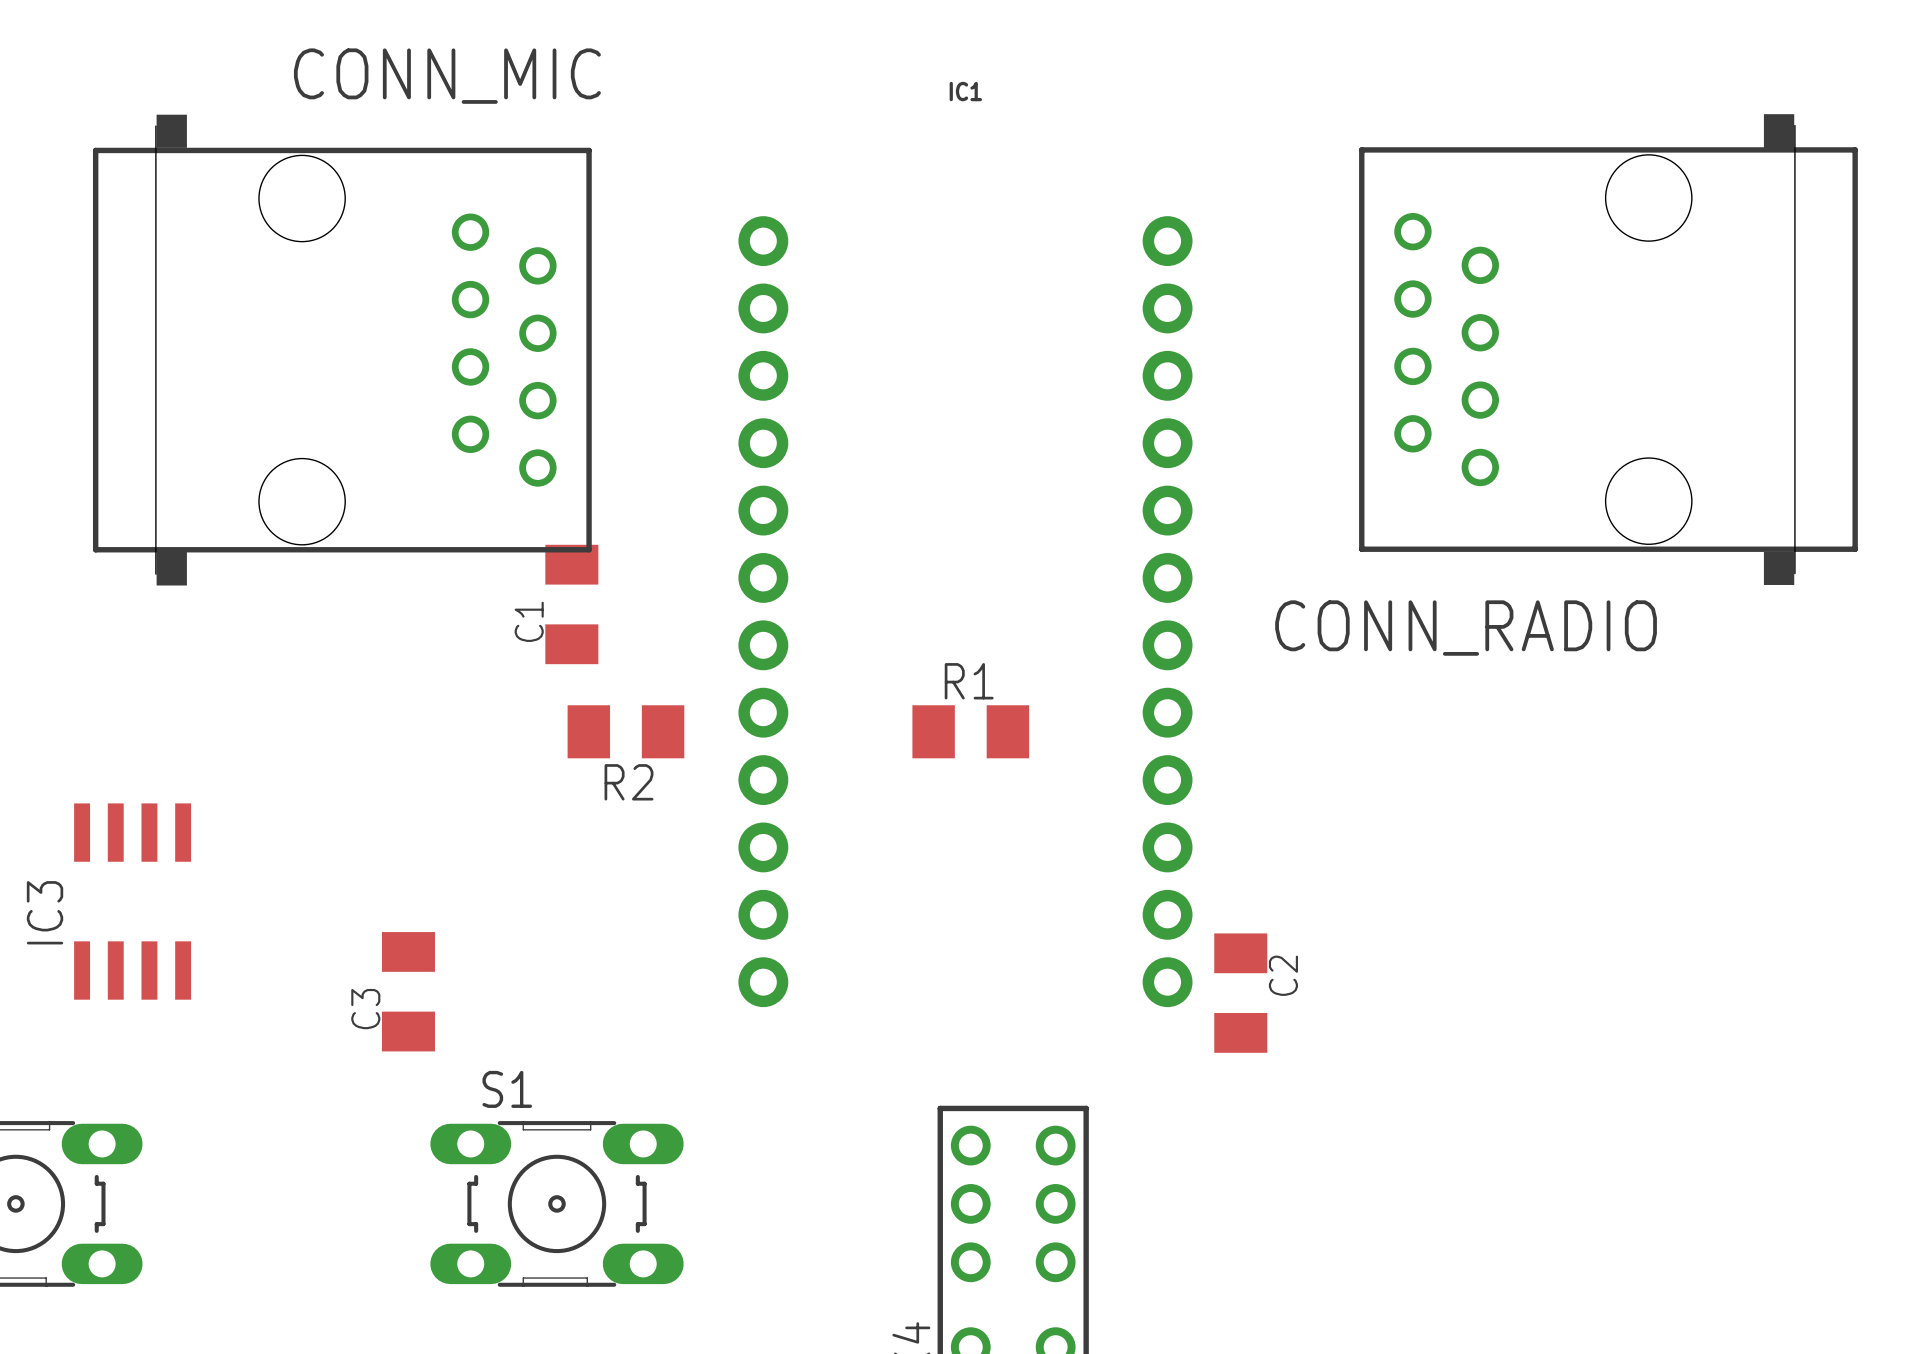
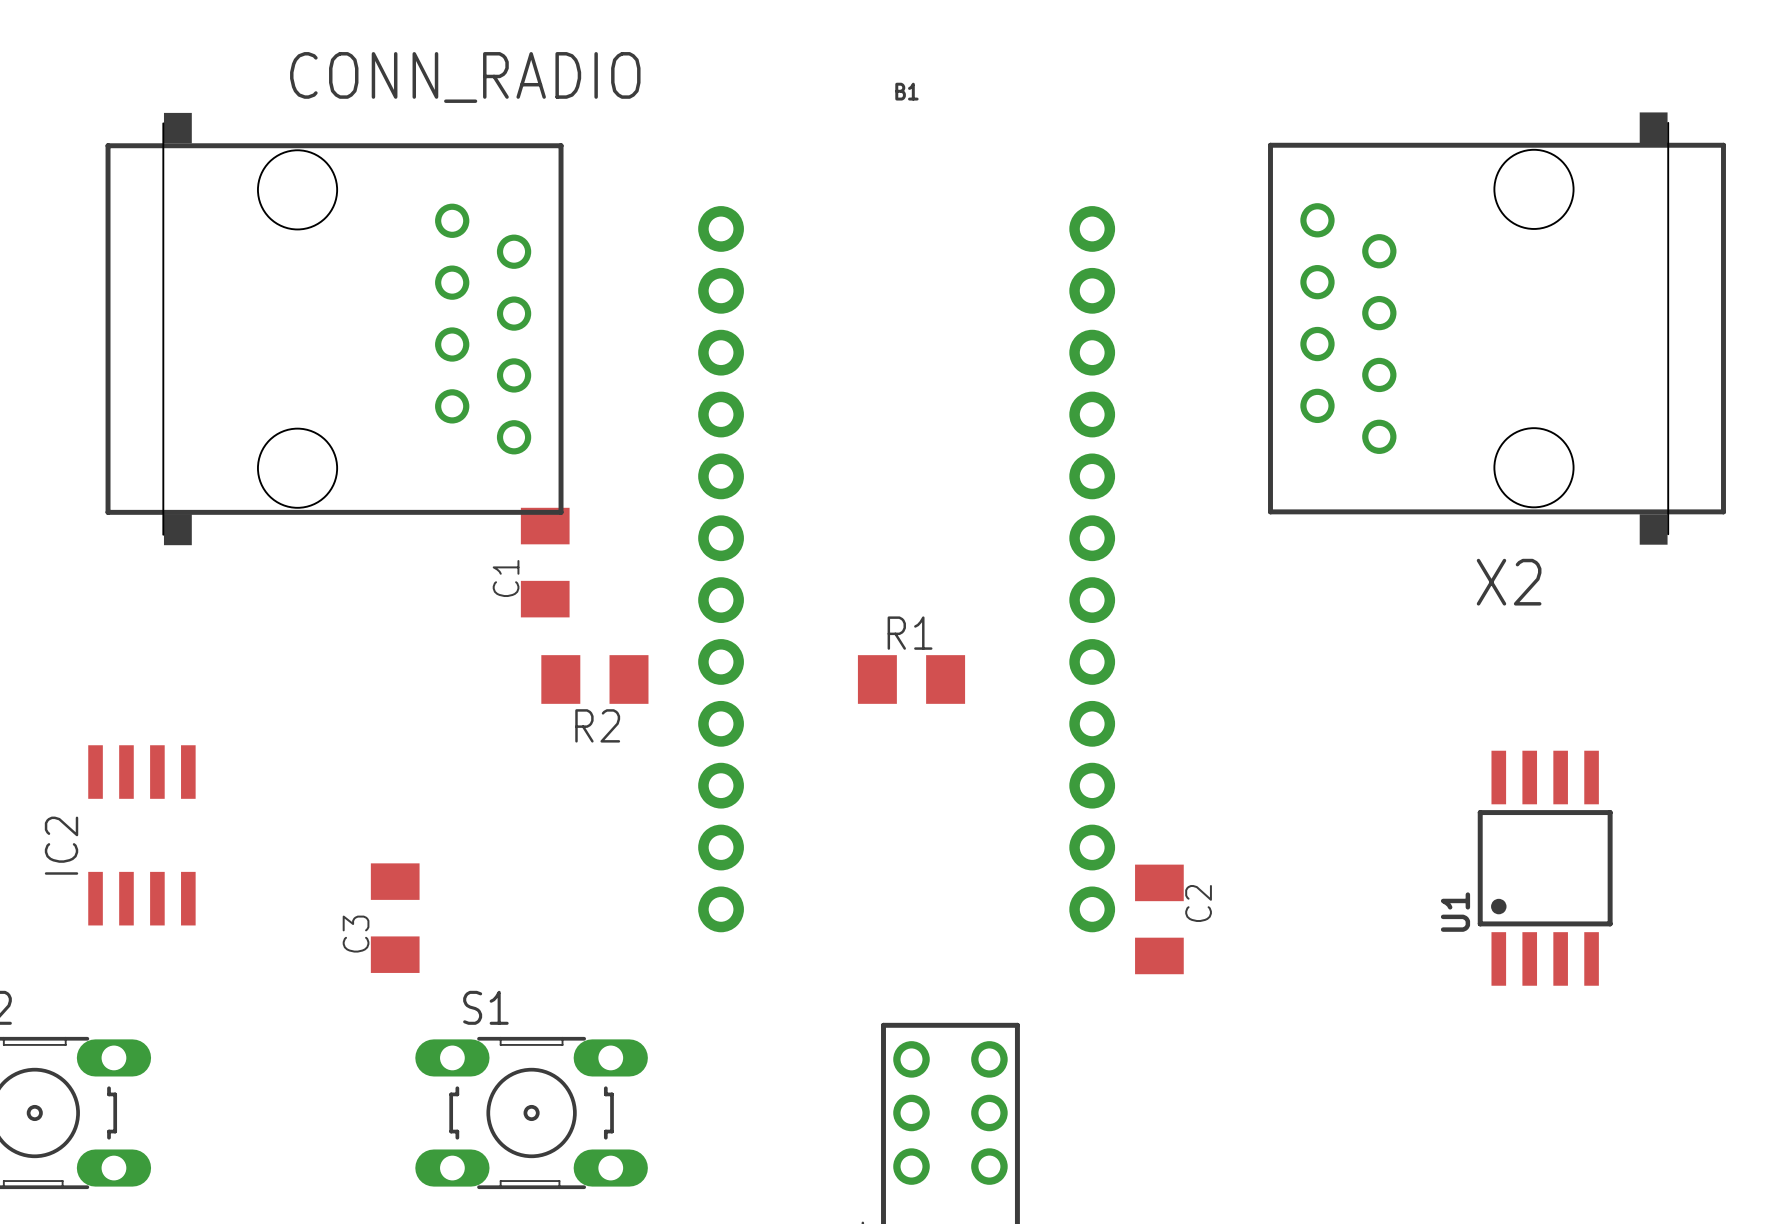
CONN_MIC name: CONN_MIC (447, 76) -> CONN_RADIO (465, 77)
IC1 name: IC1 (965, 91) -> B1 (906, 91)
CONN_RADIO name: CONN_RADIO (1466, 628) -> X2 (1509, 582)
IC3 name: IC3 (45, 912) -> IC2 (61, 845)
U1: none -> (1545, 868)

